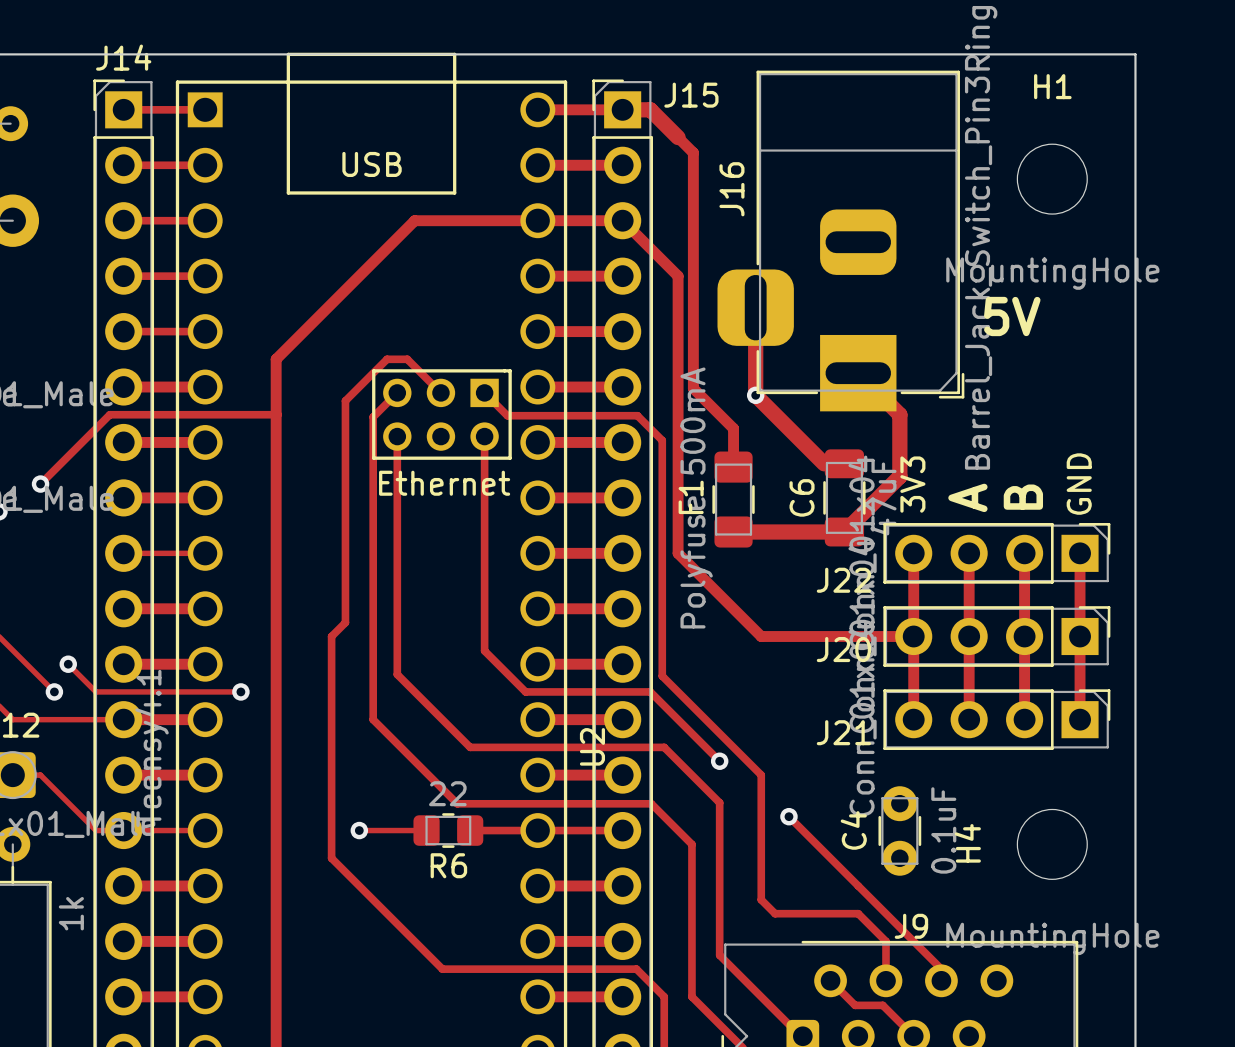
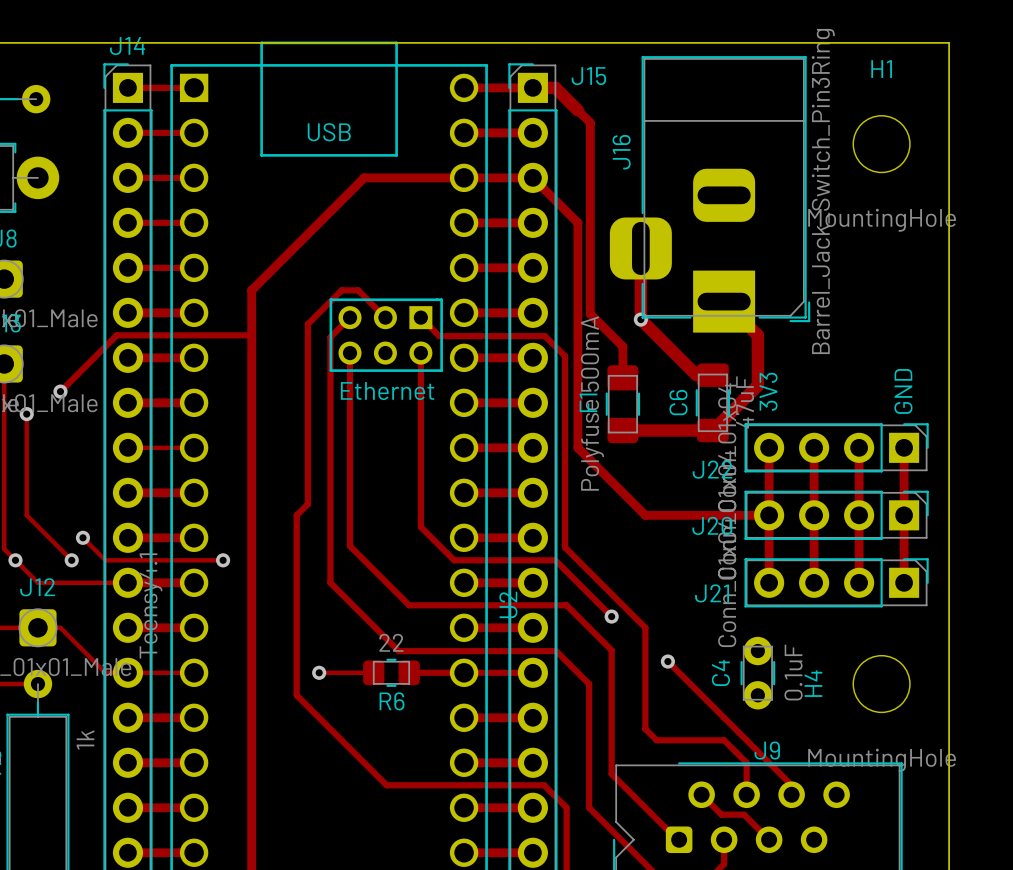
text: 5V (1012, 316) -> none
text: A (967, 497) -> none
text: B (1023, 497) -> none

